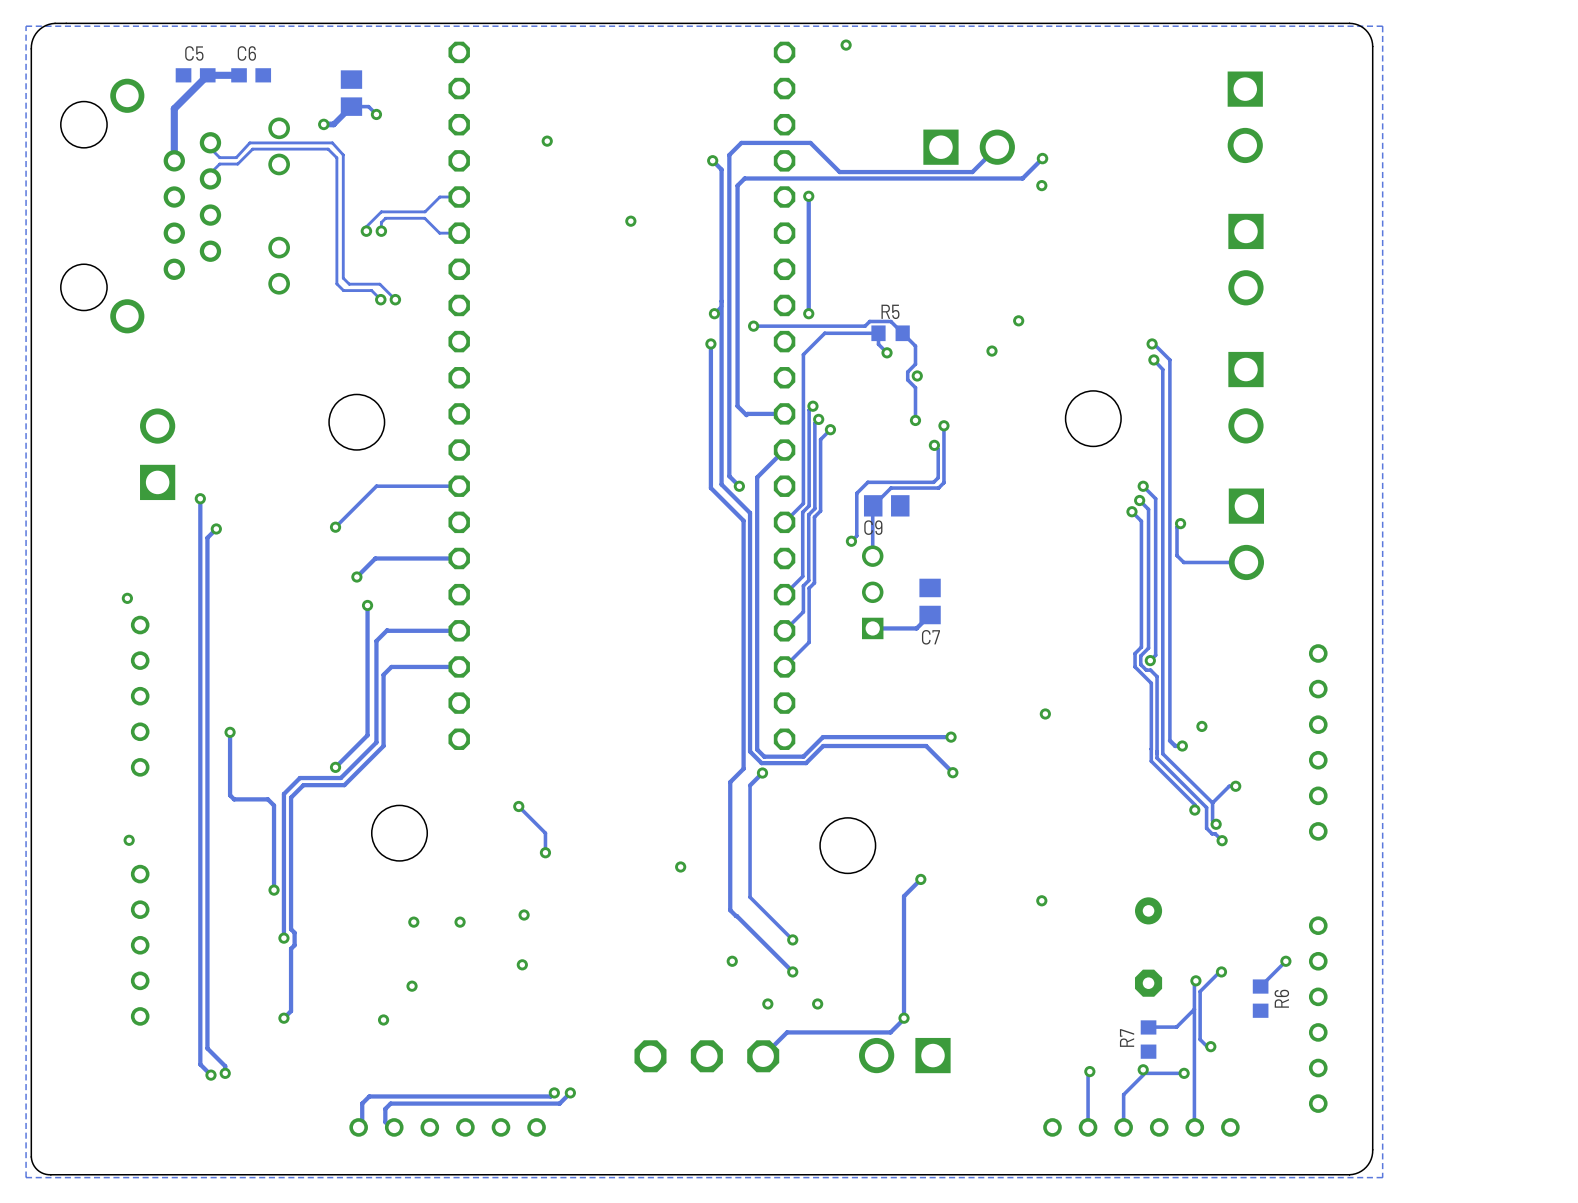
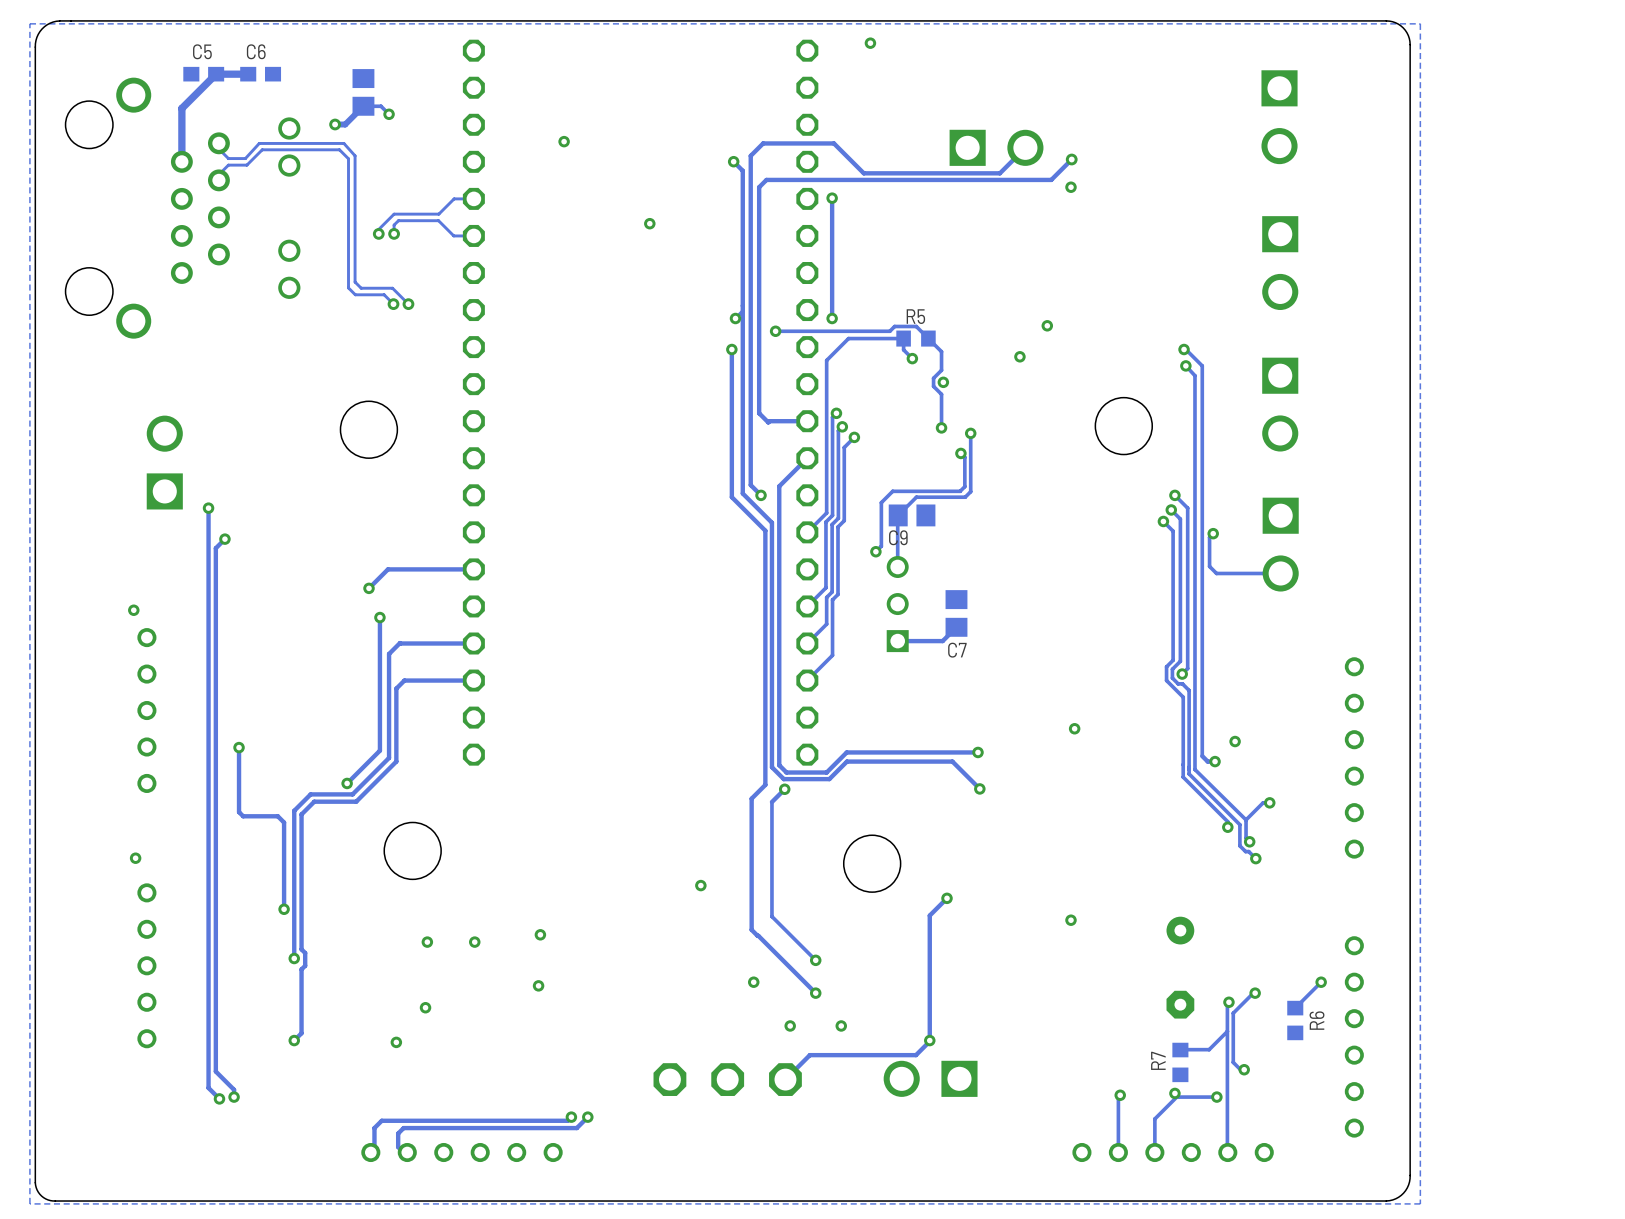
track: (459, 486) (376, 486) (335, 527) -> none
via: (335, 527) -> none
track: (518, 806) (545, 833) (545, 852) -> none
via: (518, 806) -> none
via: (545, 852) -> none

